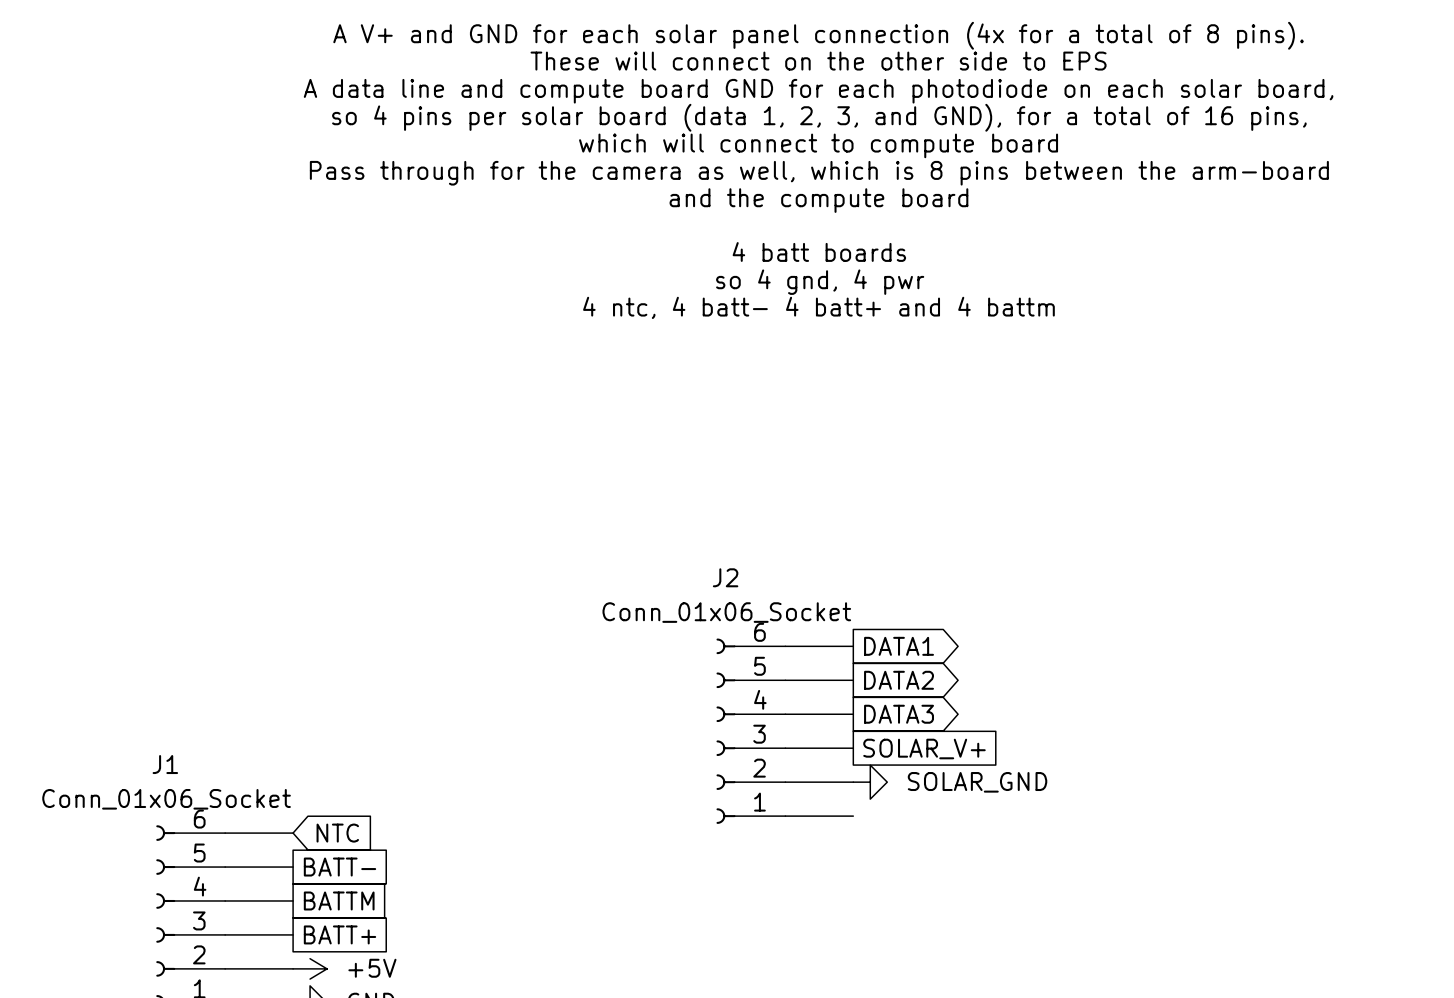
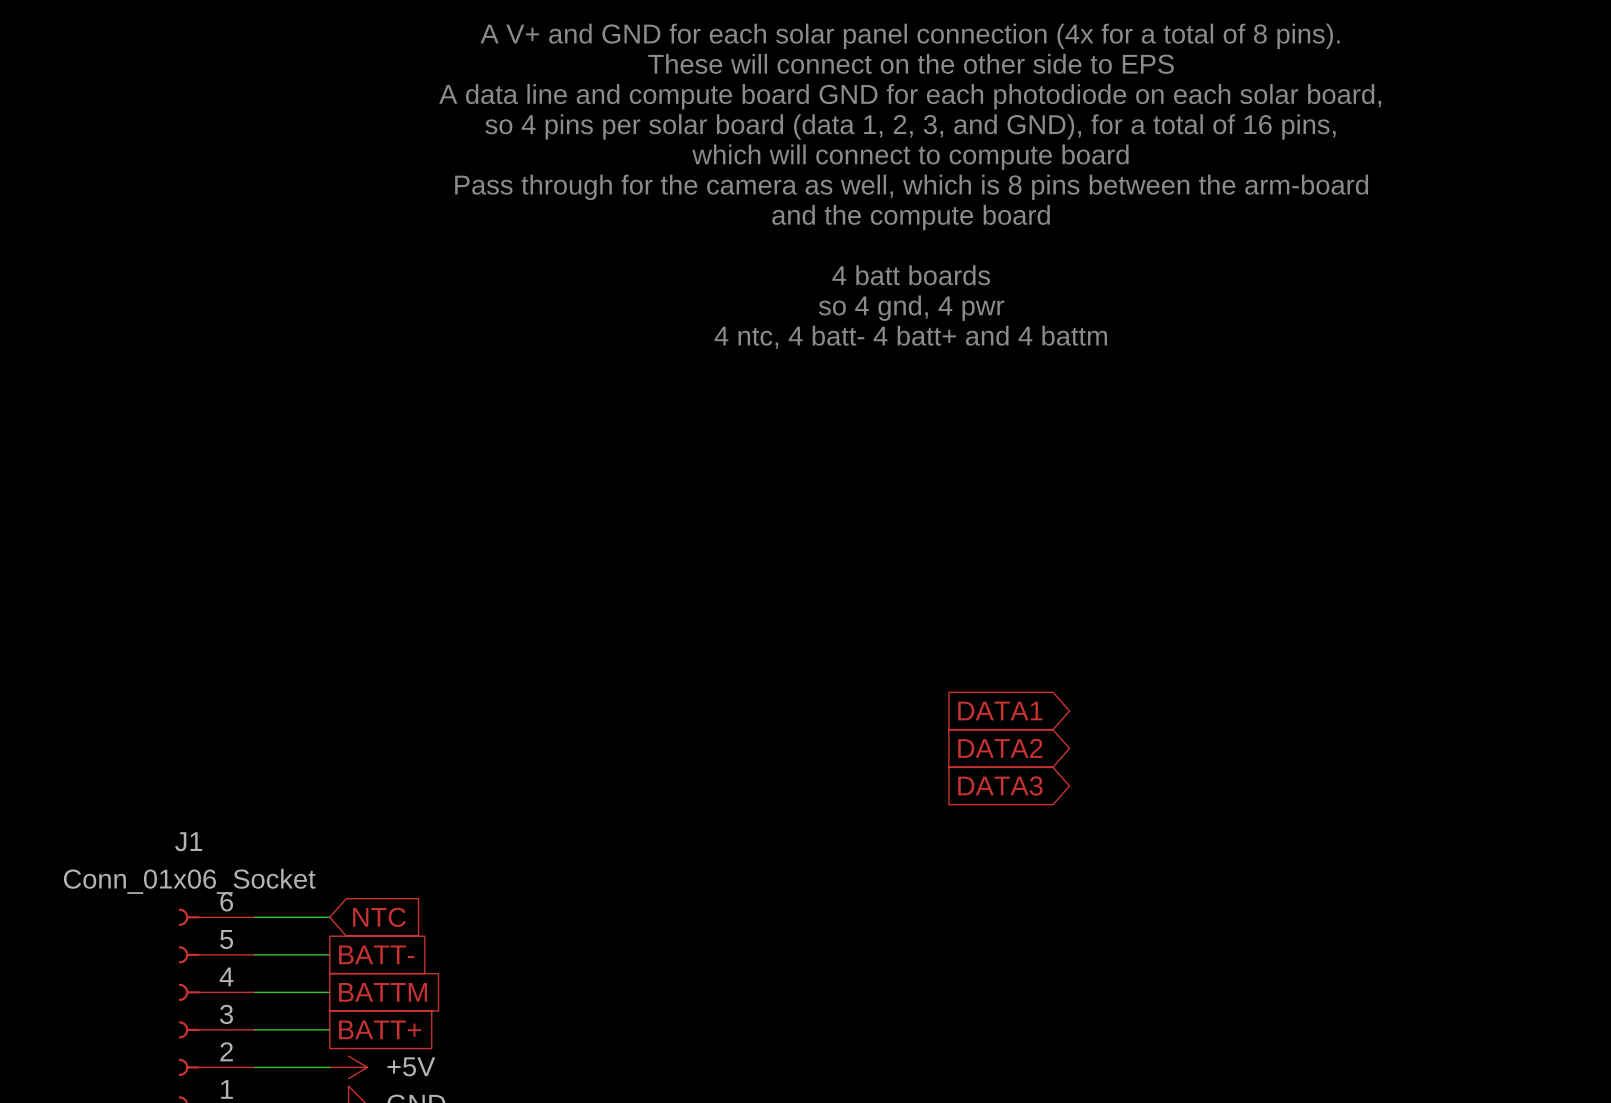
wire: (785, 646) (853, 646) -> none
wire: (785, 680) (853, 680) -> none
wire: (785, 714) (853, 714) -> none
J2: Conn_01x06_Socket (750, 731) -> none
wire: (785, 748) (853, 748) -> none
global label: SOLAR_V+ (924, 749) -> none
wire: (785, 782) (853, 782) -> none
power symbol: SOLAR_GND (870, 782) -> none
wire: (785, 816) (853, 816) -> none

